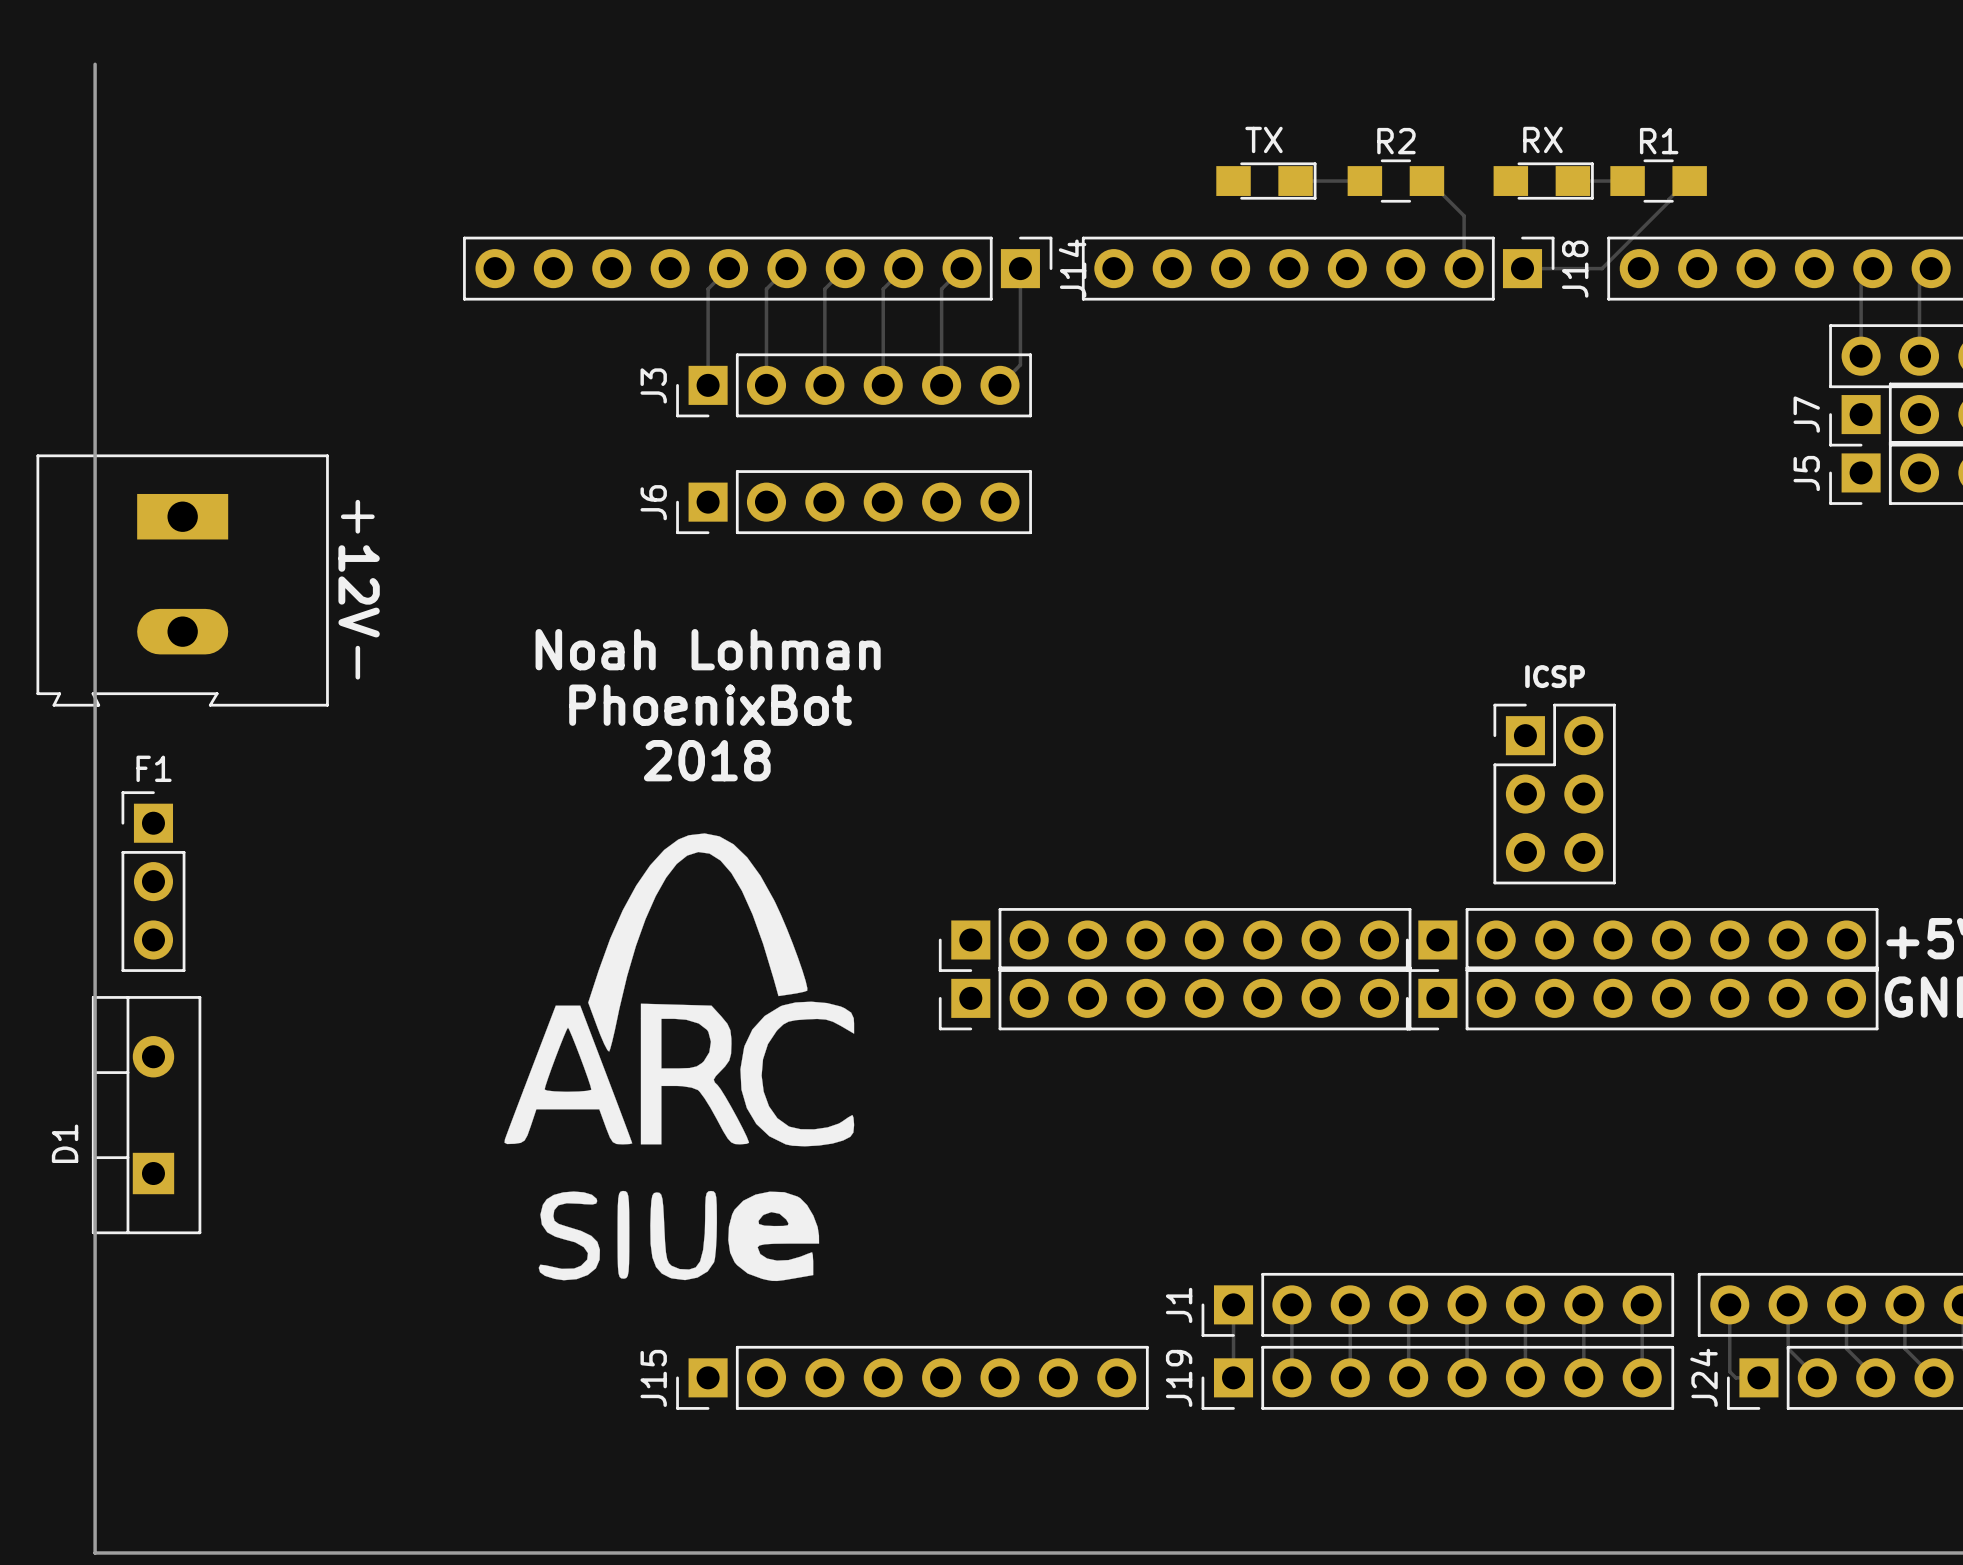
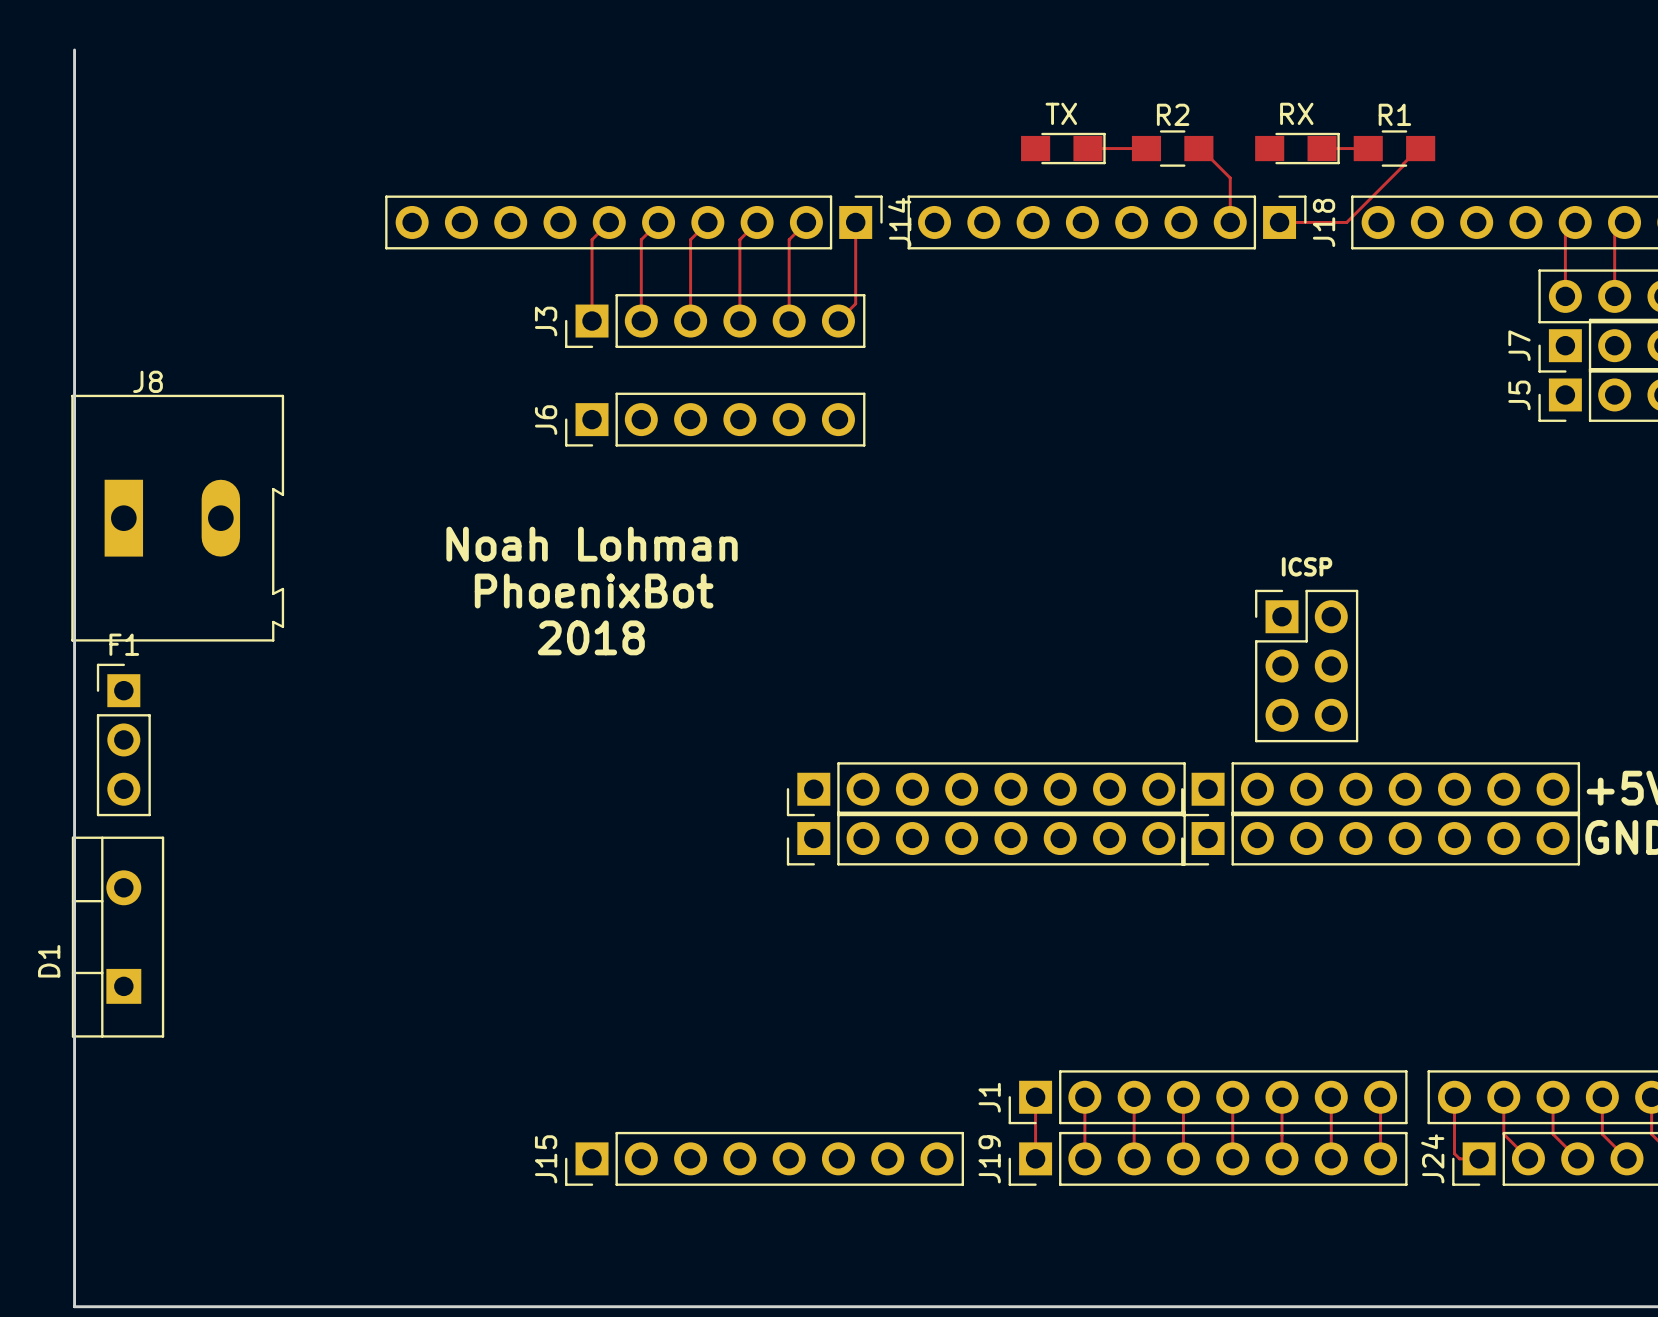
line: (357, 502) (357, 531) -> none
line: (343, 516) (372, 516) -> none
part: (182, 580) -> none
text: 12V (359, 591) -> none
J8: none -> (177, 518)
line: (357, 648) (357, 677) -> none
drawing: [504, 833, 855, 1282] -> none

